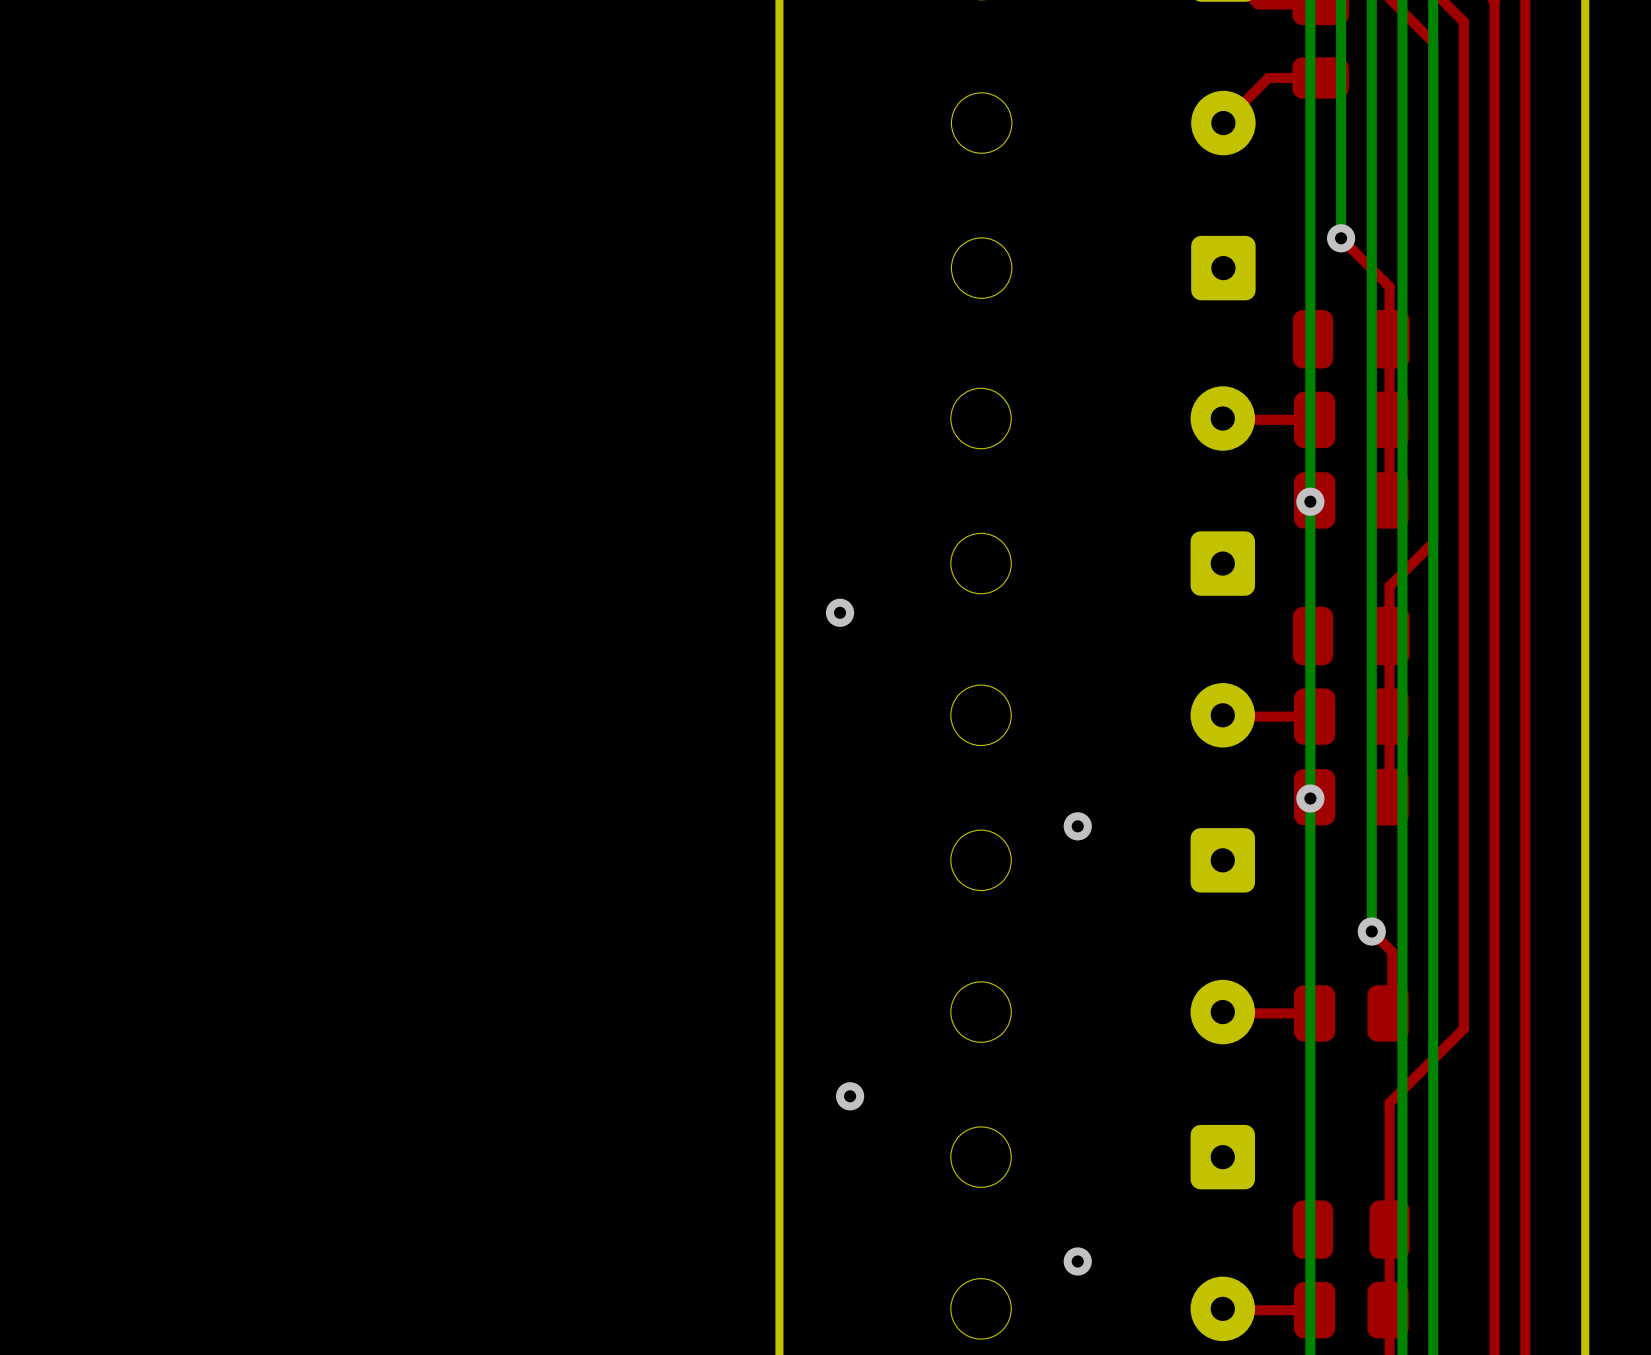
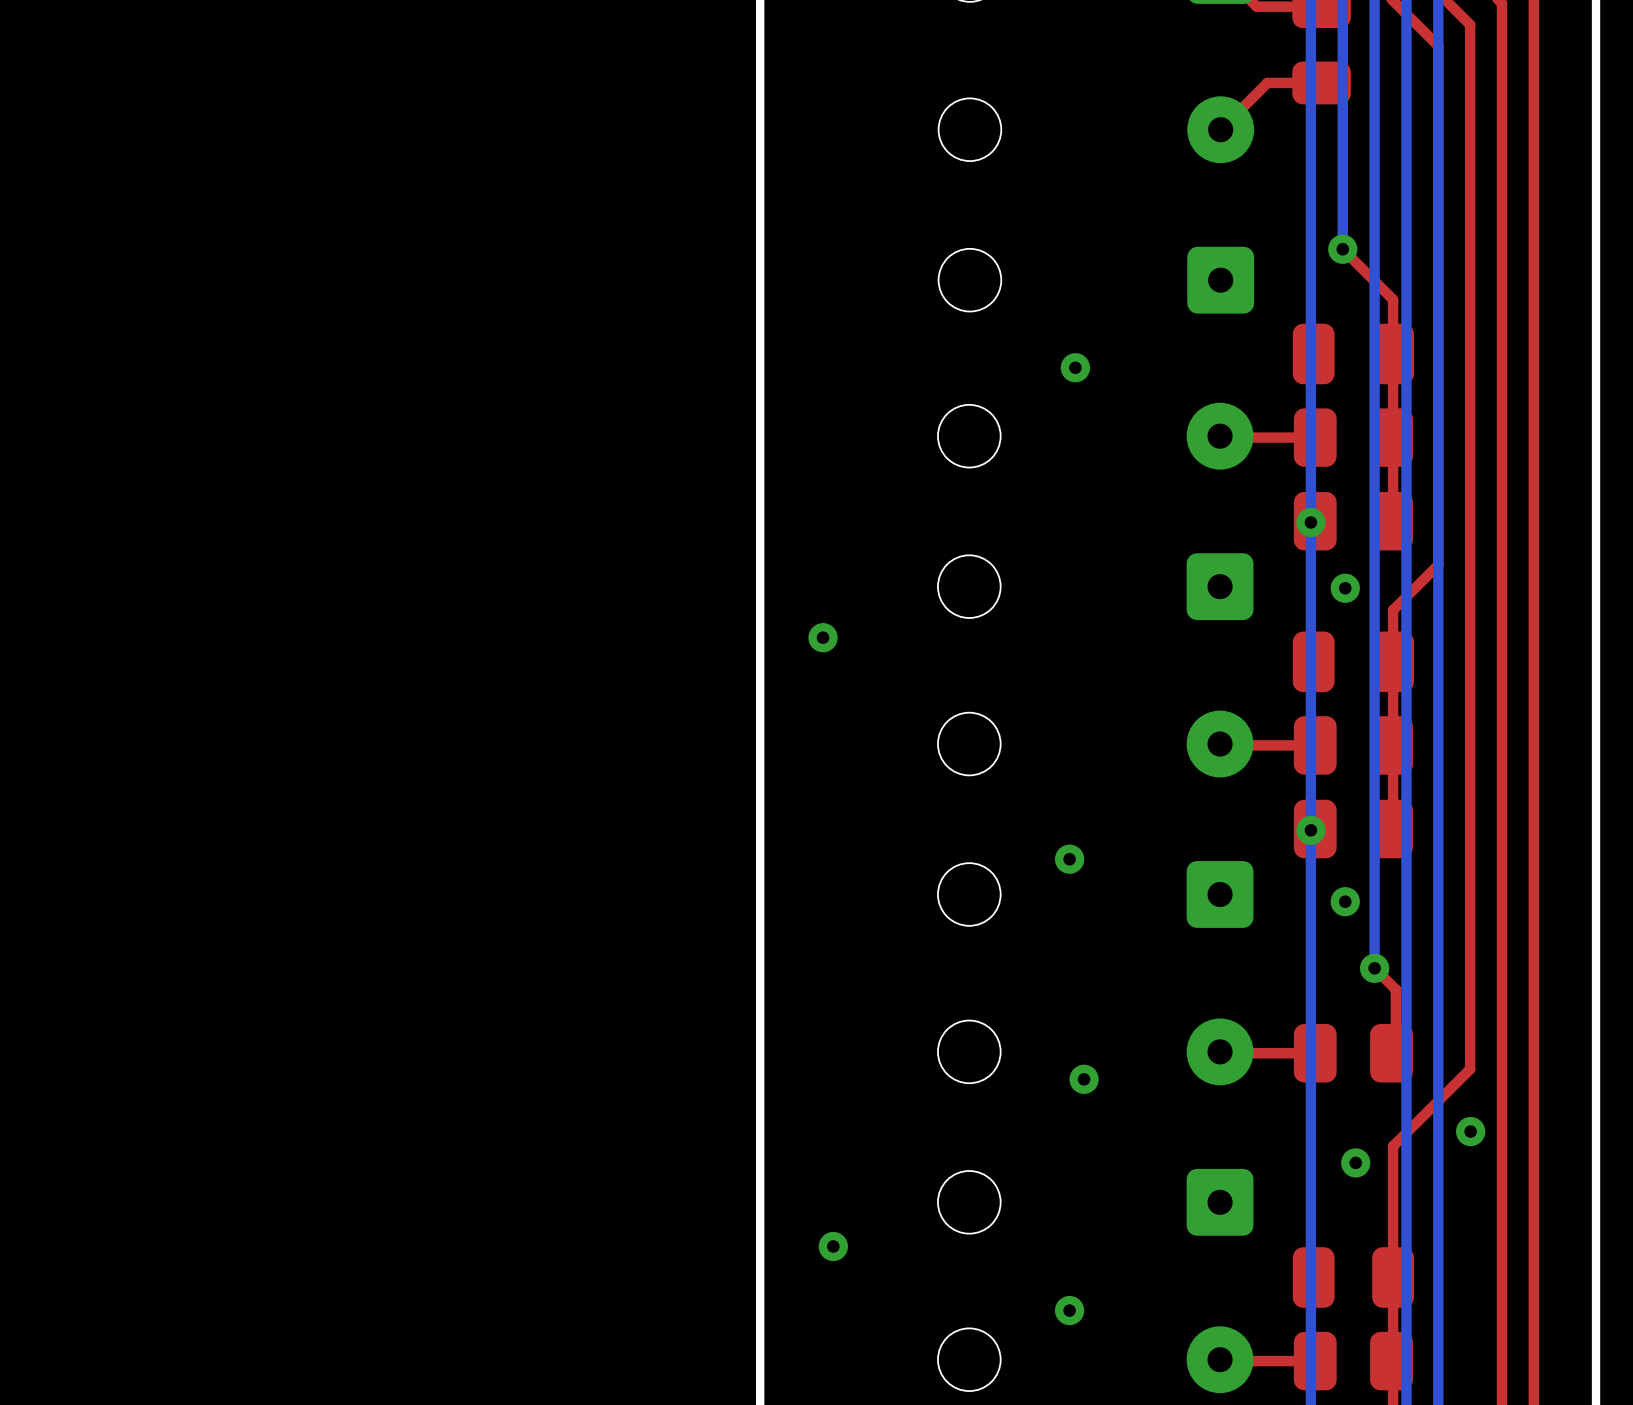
via: none -> (1075, 367)
via: none -> (1345, 588)
via: none -> (1345, 901)
via: none -> (1084, 1079)
via: none -> (1470, 1131)
via position: (850, 1096) -> (833, 1246)
via: none -> (1355, 1162)

